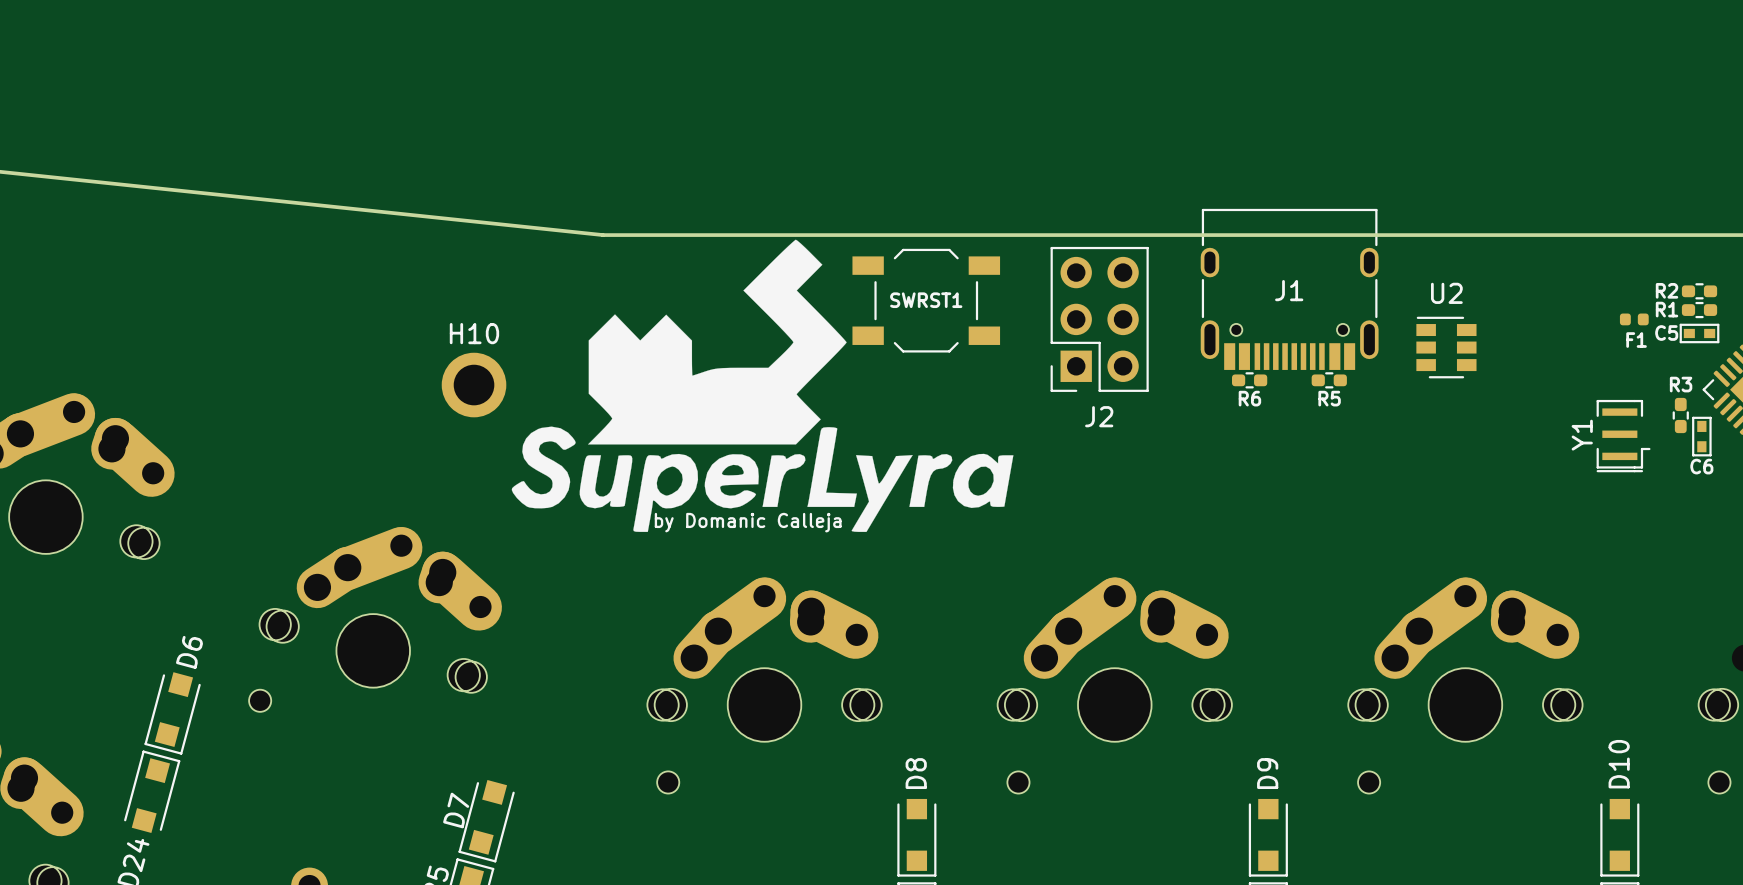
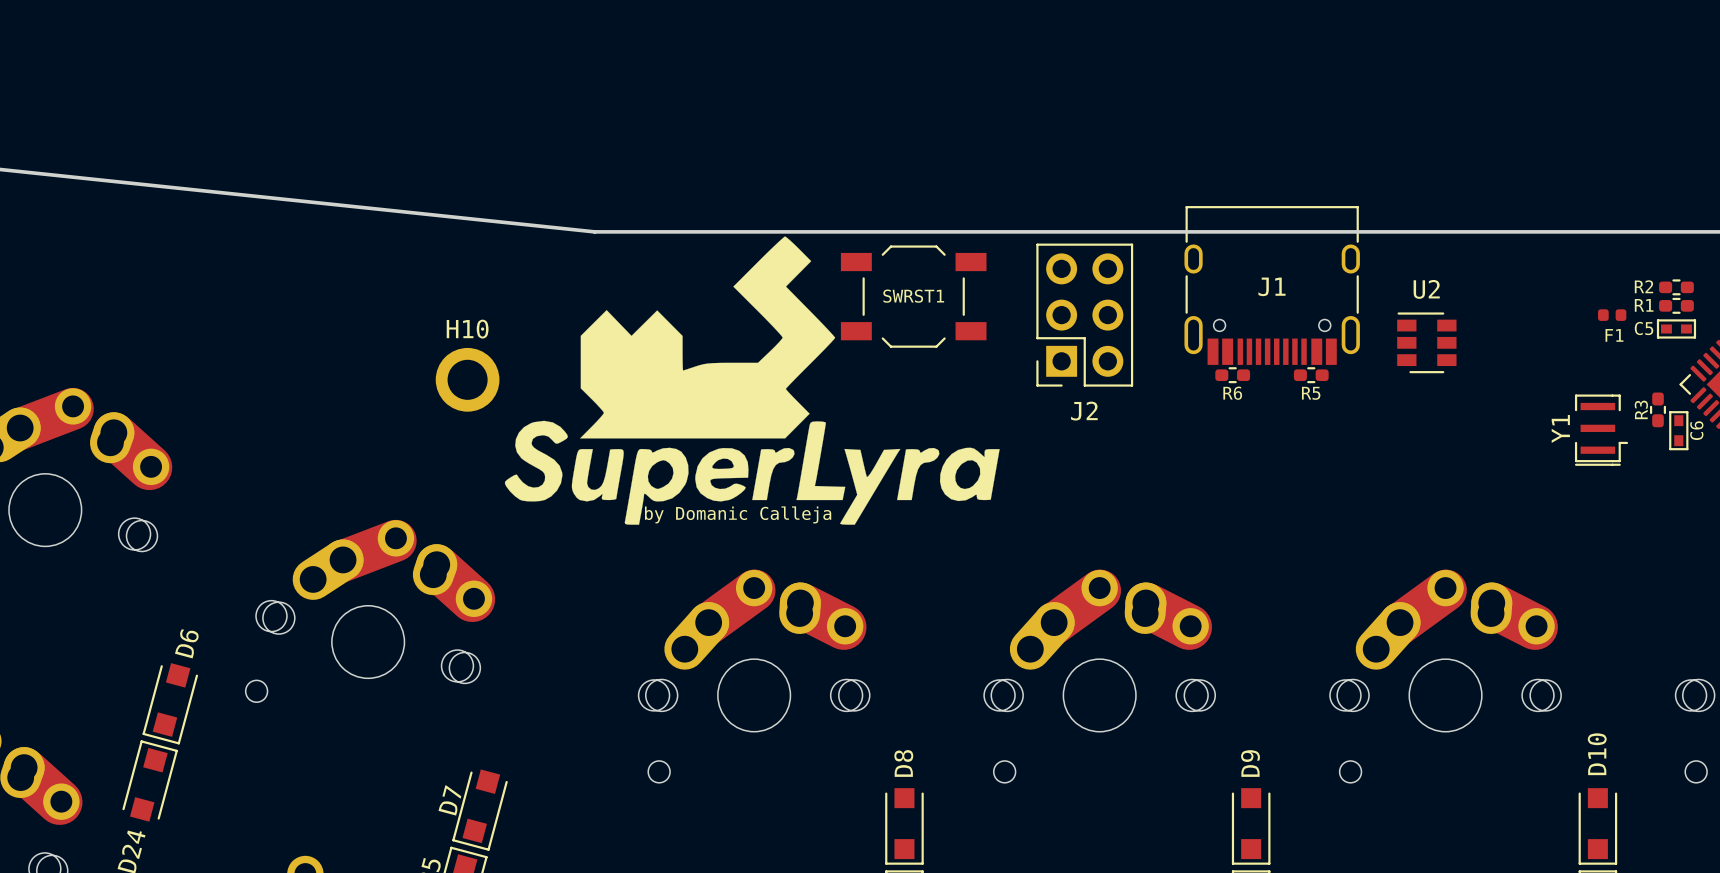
R3 name rotation: 0° (1681, 384) -> 90° counterclockwise (1641, 409)
R3 name position: R3 (1681, 384) -> R3 (1641, 409)
C6 name rotation: 0° (1701, 466) -> 90° counterclockwise (1696, 430)
C6 name position: C6 (1701, 466) -> C6 (1696, 430)

